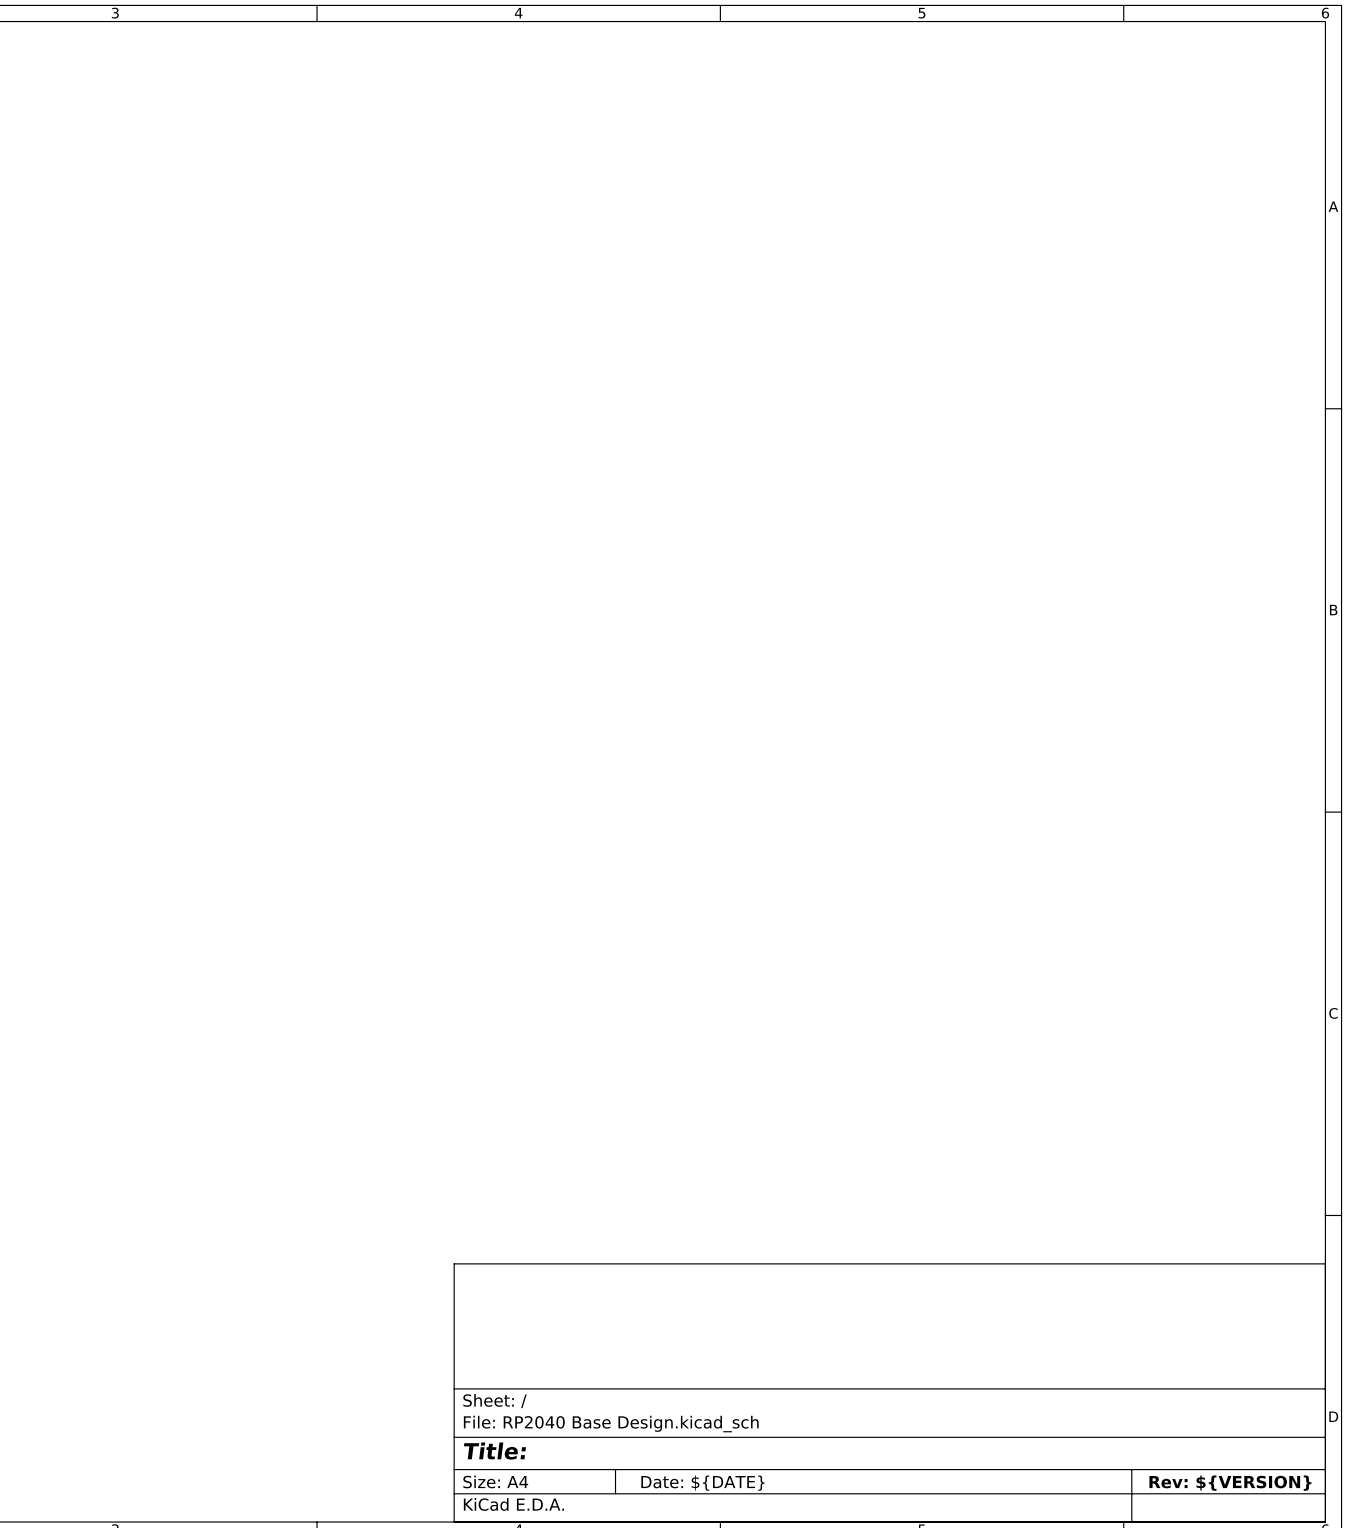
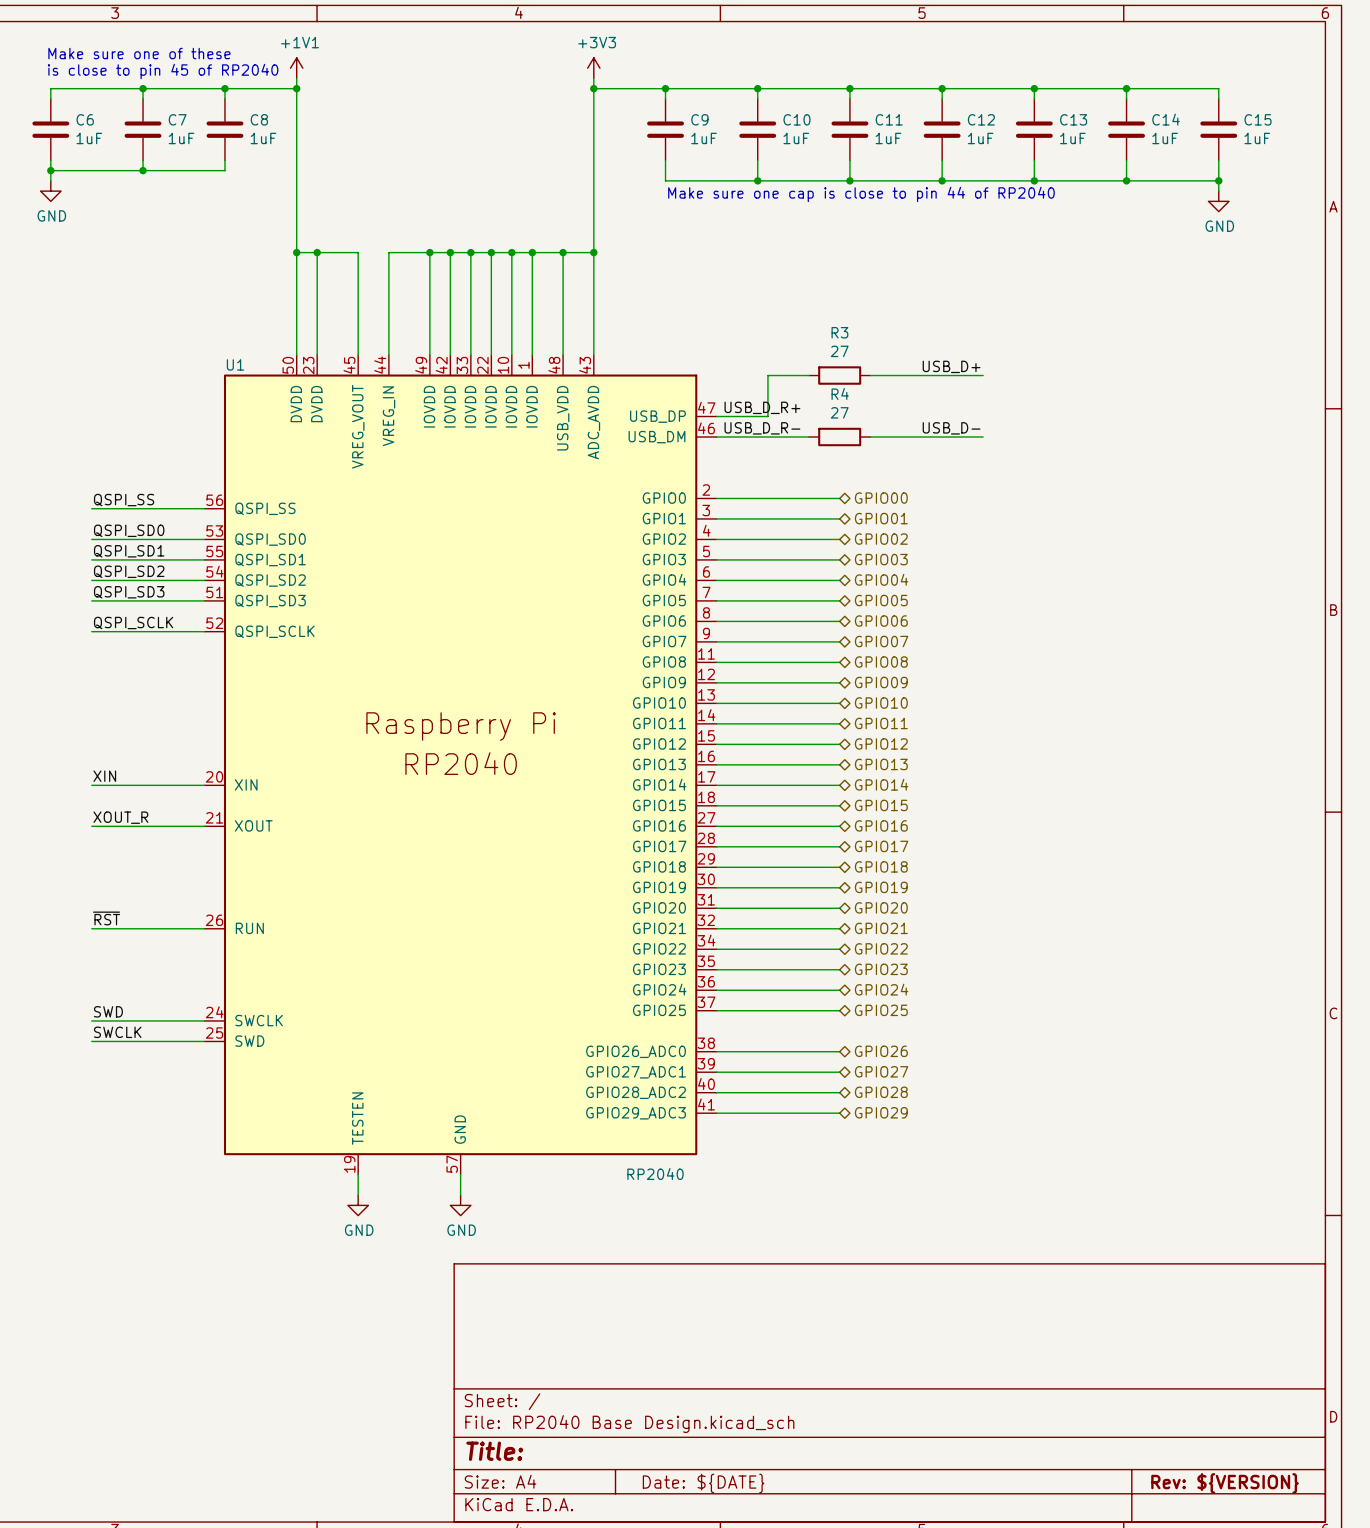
text: none -> Make sure one of these (139, 53)
power symbol: none -> +1V1 (296, 68)
power symbol: none -> +3V3 (593, 68)
text: none -> is close to pin 45 of RP2040 (163, 71)
wire: none -> (296, 78) (296, 355)
wire: none -> (593, 78) (593, 355)
wire: none -> (143, 88) (143, 98)
junction: none -> (143, 88)
wire: none -> (224, 88) (224, 98)
junction: none -> (224, 88)
wire: none -> (296, 88) (50, 88) (50, 98)
junction: none -> (296, 88)
wire: none -> (593, 88) (1218, 88) (1218, 98)
junction: none -> (593, 88)
wire: none -> (665, 88) (665, 98)
junction: none -> (665, 88)
wire: none -> (757, 88) (757, 98)
junction: none -> (757, 88)
wire: none -> (849, 88) (849, 98)
junction: none -> (849, 88)
wire: none -> (942, 88) (942, 98)
junction: none -> (942, 88)
wire: none -> (1034, 88) (1034, 98)
junction: none -> (1034, 88)
wire: none -> (1126, 88) (1126, 98)
junction: none -> (1126, 88)
C6: none -> 1uF (50, 129)
C7: none -> 1uF (143, 129)
C8: none -> 1uF (224, 129)
C9: none -> 1uF (665, 129)
C10: none -> 1uF (757, 129)
C11: none -> 1uF (849, 129)
C12: none -> 1uF (942, 129)
C13: none -> 1uF (1034, 129)
C14: none -> 1uF (1126, 129)
C15: none -> 1uF (1218, 129)
wire: none -> (50, 160) (50, 180)
wire: none -> (143, 160) (143, 170)
wire: none -> (224, 160) (224, 170) (50, 170)
wire: none -> (665, 160) (665, 180) (1218, 180)
wire: none -> (757, 160) (757, 180)
wire: none -> (849, 160) (849, 180)
wire: none -> (942, 160) (942, 180)
wire: none -> (1034, 160) (1034, 180)
wire: none -> (1126, 160) (1126, 180)
wire: none -> (1218, 160) (1218, 191)
junction: none -> (50, 170)
junction: none -> (143, 170)
junction: none -> (757, 180)
junction: none -> (849, 180)
junction: none -> (942, 180)
junction: none -> (1034, 180)
junction: none -> (1126, 180)
junction: none -> (1218, 180)
power symbol: none -> GND (50, 191)
text: none -> Make sure one cap is close to pin 44 of RP2040 (861, 194)
power symbol: none -> GND (1218, 201)
wire: none -> (296, 252) (358, 252) (358, 355)
junction: none -> (296, 252)
wire: none -> (317, 252) (317, 355)
junction: none -> (317, 252)
wire: none -> (429, 252) (429, 355)
junction: none -> (429, 252)
wire: none -> (450, 252) (450, 355)
junction: none -> (450, 252)
wire: none -> (470, 252) (470, 355)
junction: none -> (470, 252)
wire: none -> (491, 252) (491, 355)
junction: none -> (491, 252)
wire: none -> (511, 252) (511, 355)
junction: none -> (511, 252)
wire: none -> (532, 252) (532, 355)
junction: none -> (532, 252)
wire: none -> (563, 252) (563, 355)
junction: none -> (563, 252)
wire: none -> (593, 252) (388, 252) (388, 355)
junction: none -> (593, 252)
label: none -> USB_D+ (951, 366)
wire: none -> (808, 375) (767, 375) (767, 416) (716, 416)
R3: none -> 27 (839, 375)
wire: none -> (870, 375) (983, 375)
label: none -> USB_D_R+ (762, 407)
label: none -> USB_D_R- (762, 428)
label: none -> USB_D- (951, 428)
wire: none -> (716, 437) (808, 437)
R4: none -> 27 (839, 437)
wire: none -> (870, 437) (983, 437)
wire: none -> (716, 498) (839, 498)
hierarchical label: none -> GPIO00 (881, 498)
label: none -> QSPI_SS (124, 500)
wire: none -> (91, 508) (204, 508)
wire: none -> (716, 518) (839, 518)
hierarchical label: none -> GPIO01 (881, 518)
label: none -> QSPI_SD0 (129, 530)
wire: none -> (91, 539) (204, 539)
wire: none -> (716, 539) (839, 539)
hierarchical label: none -> GPIO02 (881, 539)
label: none -> QSPI_SD1 (129, 551)
wire: none -> (91, 559) (204, 559)
wire: none -> (716, 559) (839, 559)
hierarchical label: none -> GPIO03 (881, 559)
label: none -> QSPI_SD2 (129, 571)
wire: none -> (91, 580) (204, 580)
wire: none -> (716, 580) (839, 580)
hierarchical label: none -> GPIO04 (881, 579)
label: none -> QSPI_SD3 (129, 592)
wire: none -> (91, 600) (204, 600)
wire: none -> (716, 600) (839, 600)
hierarchical label: none -> GPIO05 (881, 600)
wire: none -> (716, 621) (839, 621)
hierarchical label: none -> GPIO06 (881, 621)
label: none -> QSPI_SCLK (133, 623)
wire: none -> (91, 631) (204, 631)
wire: none -> (716, 641) (839, 641)
hierarchical label: none -> GPIO07 (881, 641)
wire: none -> (716, 662) (839, 662)
hierarchical label: none -> GPIO08 (881, 662)
wire: none -> (716, 682) (839, 682)
hierarchical label: none -> GPIO09 (881, 682)
wire: none -> (716, 703) (839, 703)
hierarchical label: none -> GPIO10 (881, 702)
wire: none -> (716, 723) (839, 723)
hierarchical label: none -> GPIO11 (881, 723)
hierarchical label: none -> GPIO12 (881, 743)
wire: none -> (716, 744) (839, 744)
U1: none -> RP2040 (460, 764)
wire: none -> (716, 764) (839, 764)
hierarchical label: none -> GPIO13 (881, 764)
label: none -> XIN (104, 776)
hierarchical label: none -> GPIO14 (881, 784)
wire: none -> (91, 785) (204, 785)
wire: none -> (716, 785) (839, 785)
wire: none -> (716, 805) (839, 805)
hierarchical label: none -> GPIO15 (881, 805)
label: none -> XOUT_R (120, 817)
hierarchical label: none -> GPIO16 (881, 825)
wire: none -> (91, 826) (204, 826)
wire: none -> (716, 826) (839, 826)
wire: none -> (716, 846) (839, 846)
hierarchical label: none -> GPIO17 (881, 846)
hierarchical label: none -> GPIO18 (881, 866)
wire: none -> (716, 867) (839, 867)
wire: none -> (716, 887) (839, 887)
hierarchical label: none -> GPIO19 (881, 887)
hierarchical label: none -> GPIO20 (881, 907)
wire: none -> (716, 908) (839, 908)
label: none -> ~{RST} (106, 918)
wire: none -> (91, 928) (204, 928)
wire: none -> (716, 928) (839, 928)
hierarchical label: none -> GPIO21 (881, 928)
hierarchical label: none -> GPIO22 (881, 948)
wire: none -> (716, 949) (839, 949)
wire: none -> (716, 969) (839, 969)
hierarchical label: none -> GPIO23 (881, 969)
hierarchical label: none -> GPIO24 (881, 989)
wire: none -> (716, 990) (839, 990)
wire: none -> (716, 1010) (839, 1010)
hierarchical label: none -> GPIO25 (881, 1010)
label: none -> SWD (108, 1011)
wire: none -> (91, 1020) (204, 1020)
label: none -> SWCLK (117, 1032)
wire: none -> (91, 1041) (204, 1041)
wire: none -> (716, 1051) (839, 1051)
hierarchical label: none -> GPIO26 (881, 1051)
hierarchical label: none -> GPIO27 (881, 1071)
wire: none -> (716, 1072) (839, 1072)
wire: none -> (716, 1092) (839, 1092)
hierarchical label: none -> GPIO28 (881, 1092)
hierarchical label: none -> GPIO29 (881, 1112)
wire: none -> (716, 1113) (839, 1113)
wire: none -> (358, 1174) (358, 1195)
wire: none -> (460, 1174) (460, 1195)
power symbol: none -> GND (358, 1205)
power symbol: none -> GND (460, 1205)

